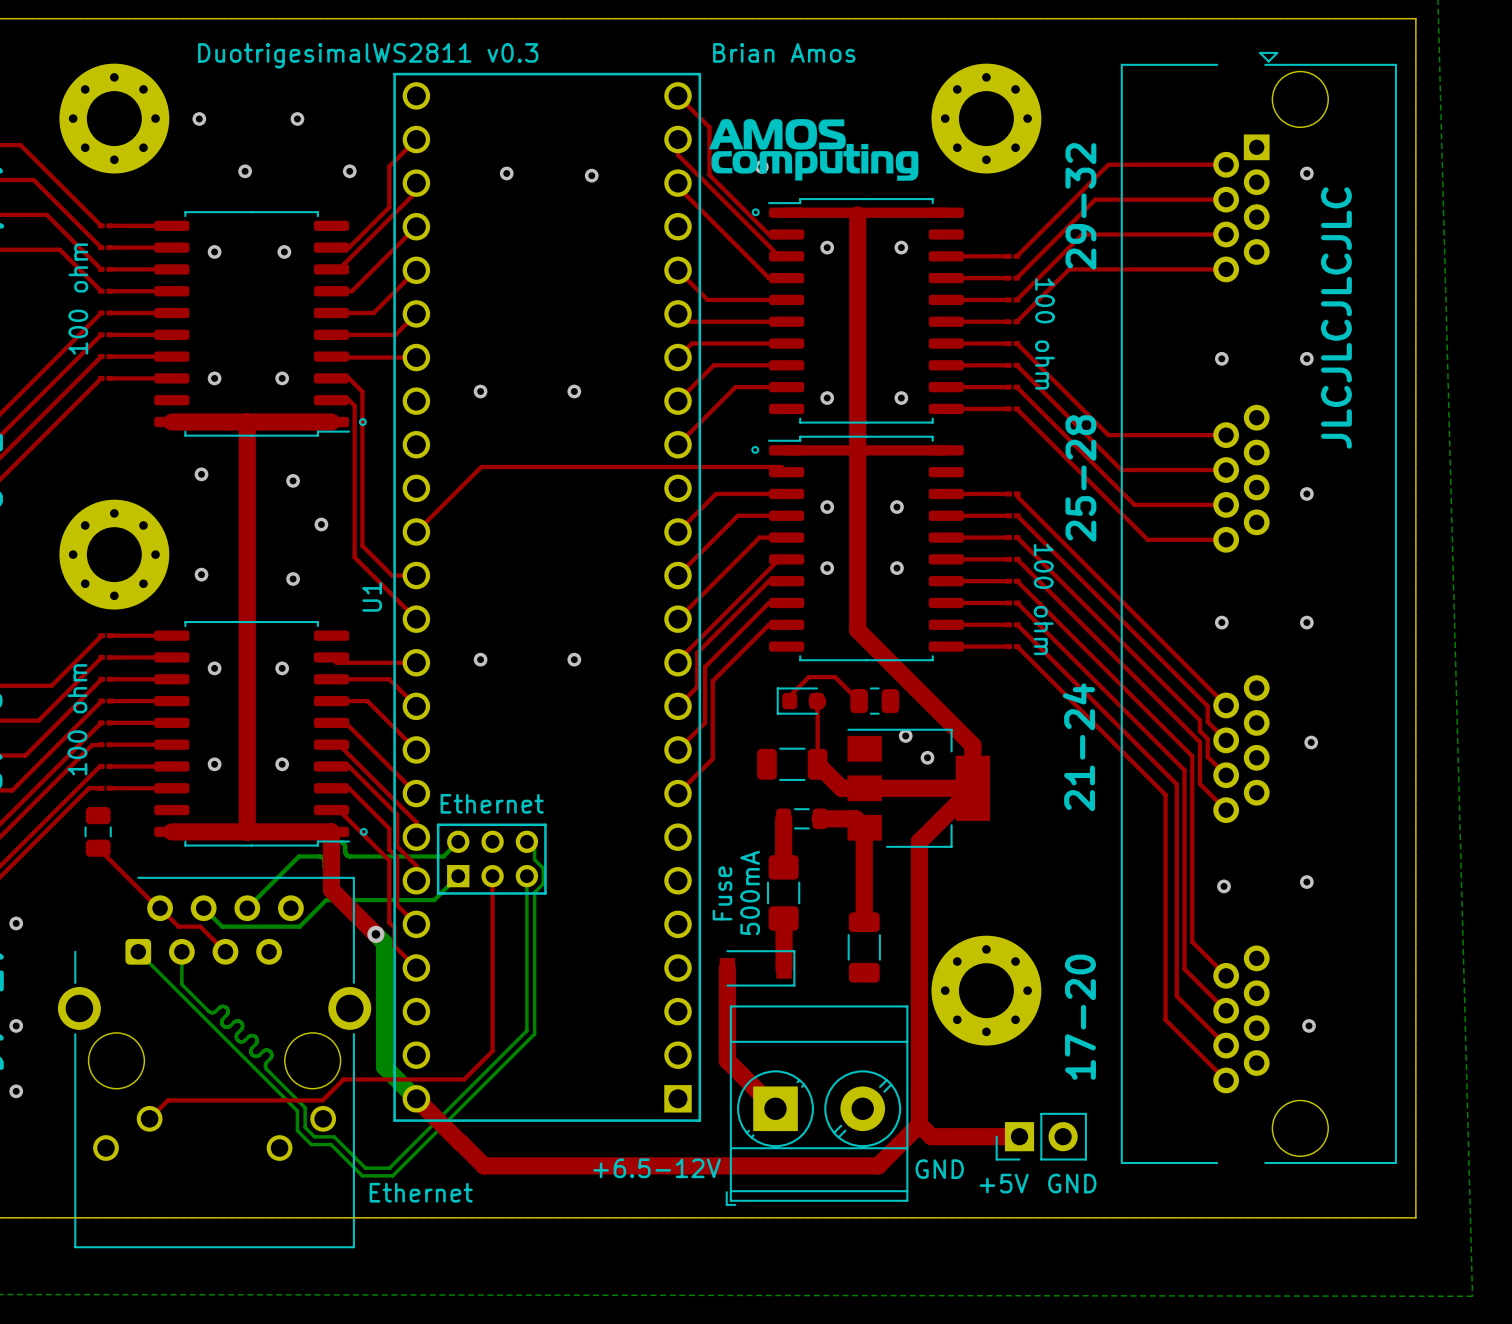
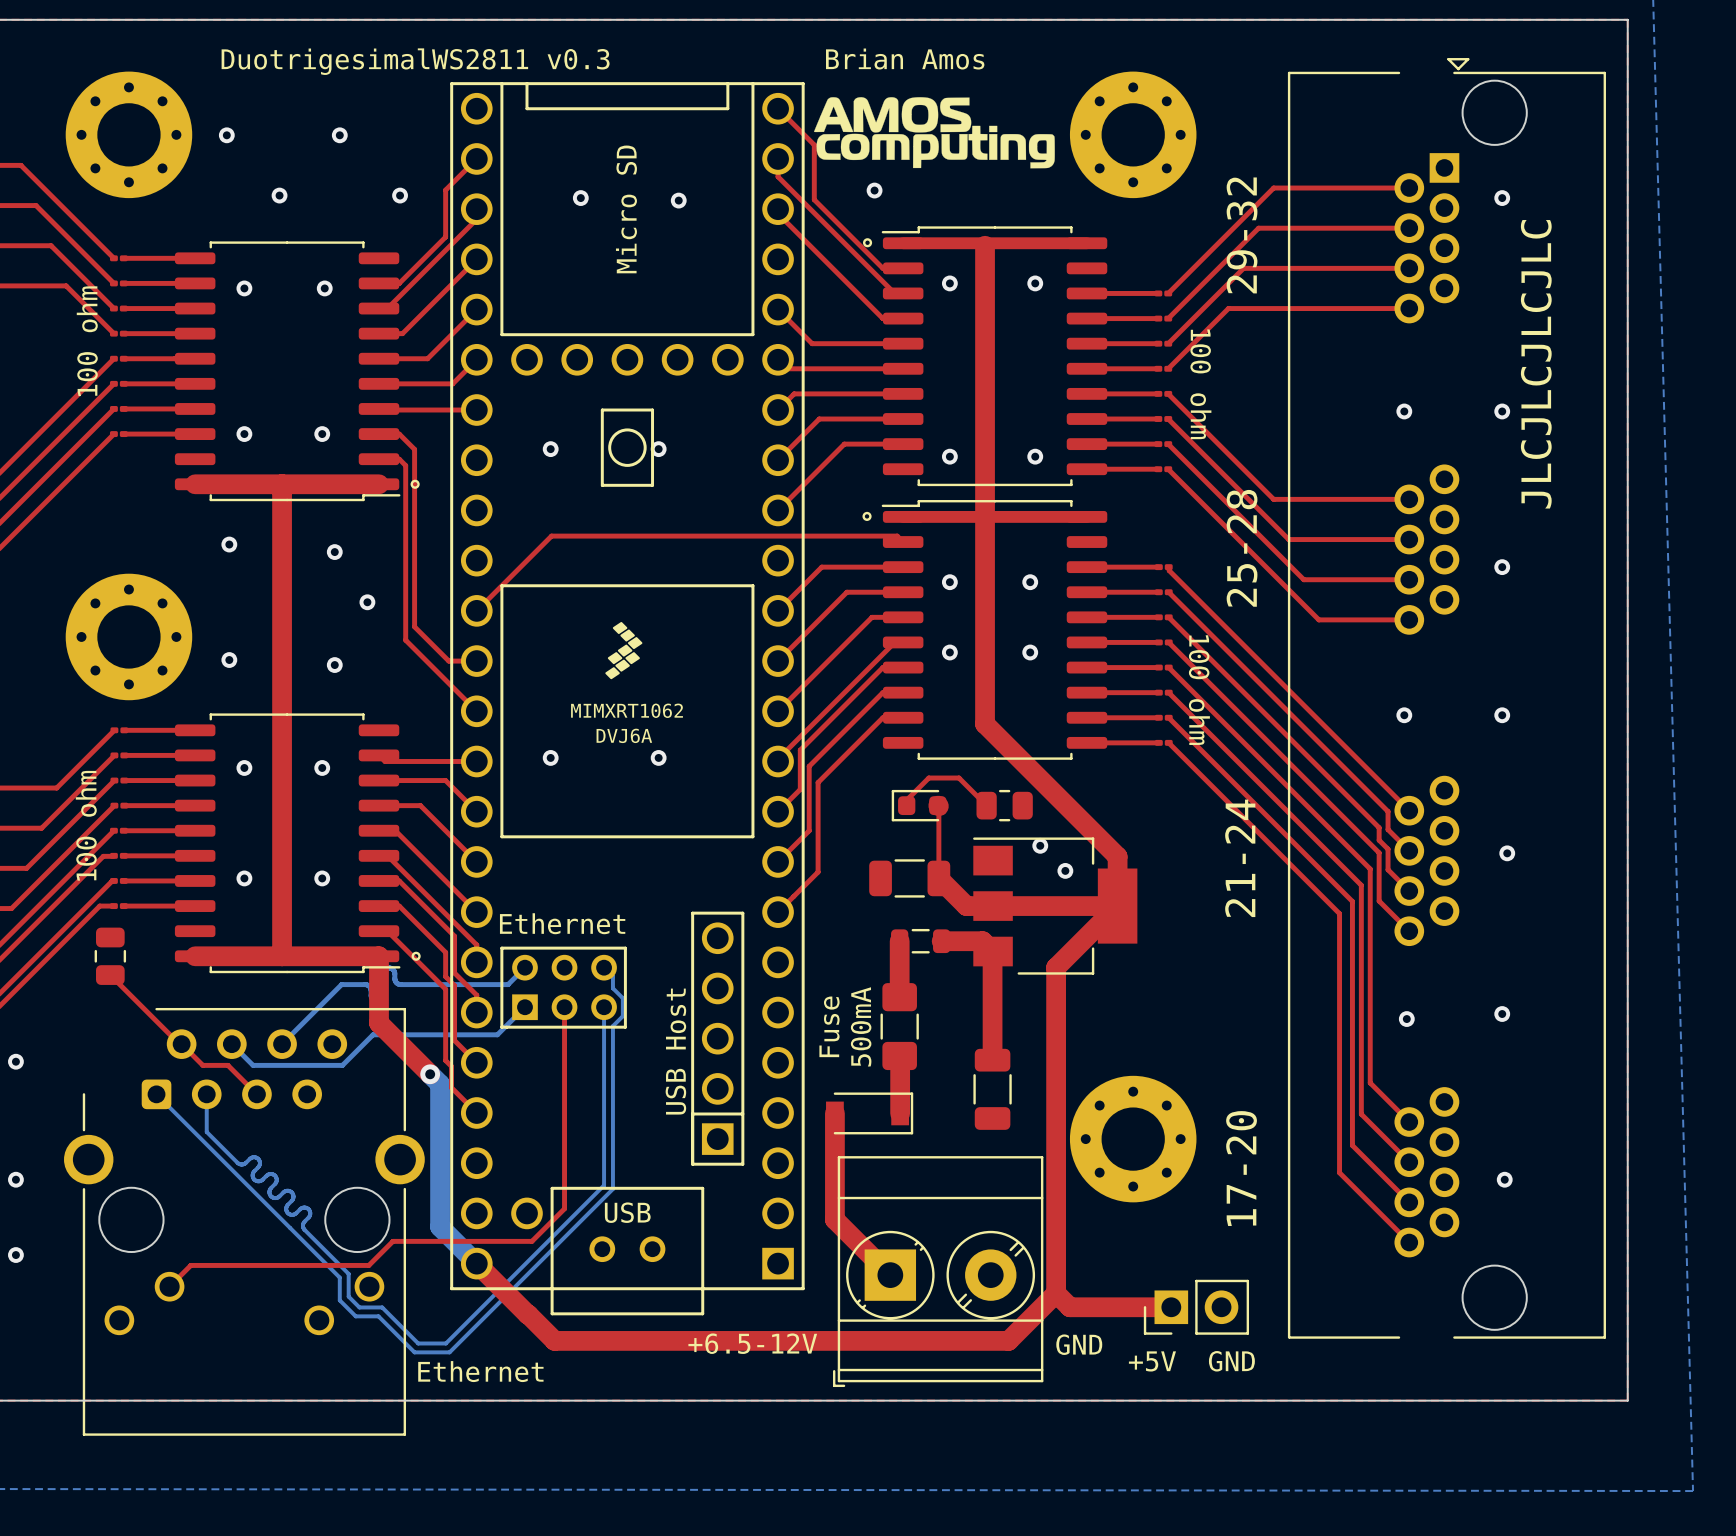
drawing position: (813, 149) -> (934, 132)
U1: (547, 597) -> none
part: none -> (627, 698)

